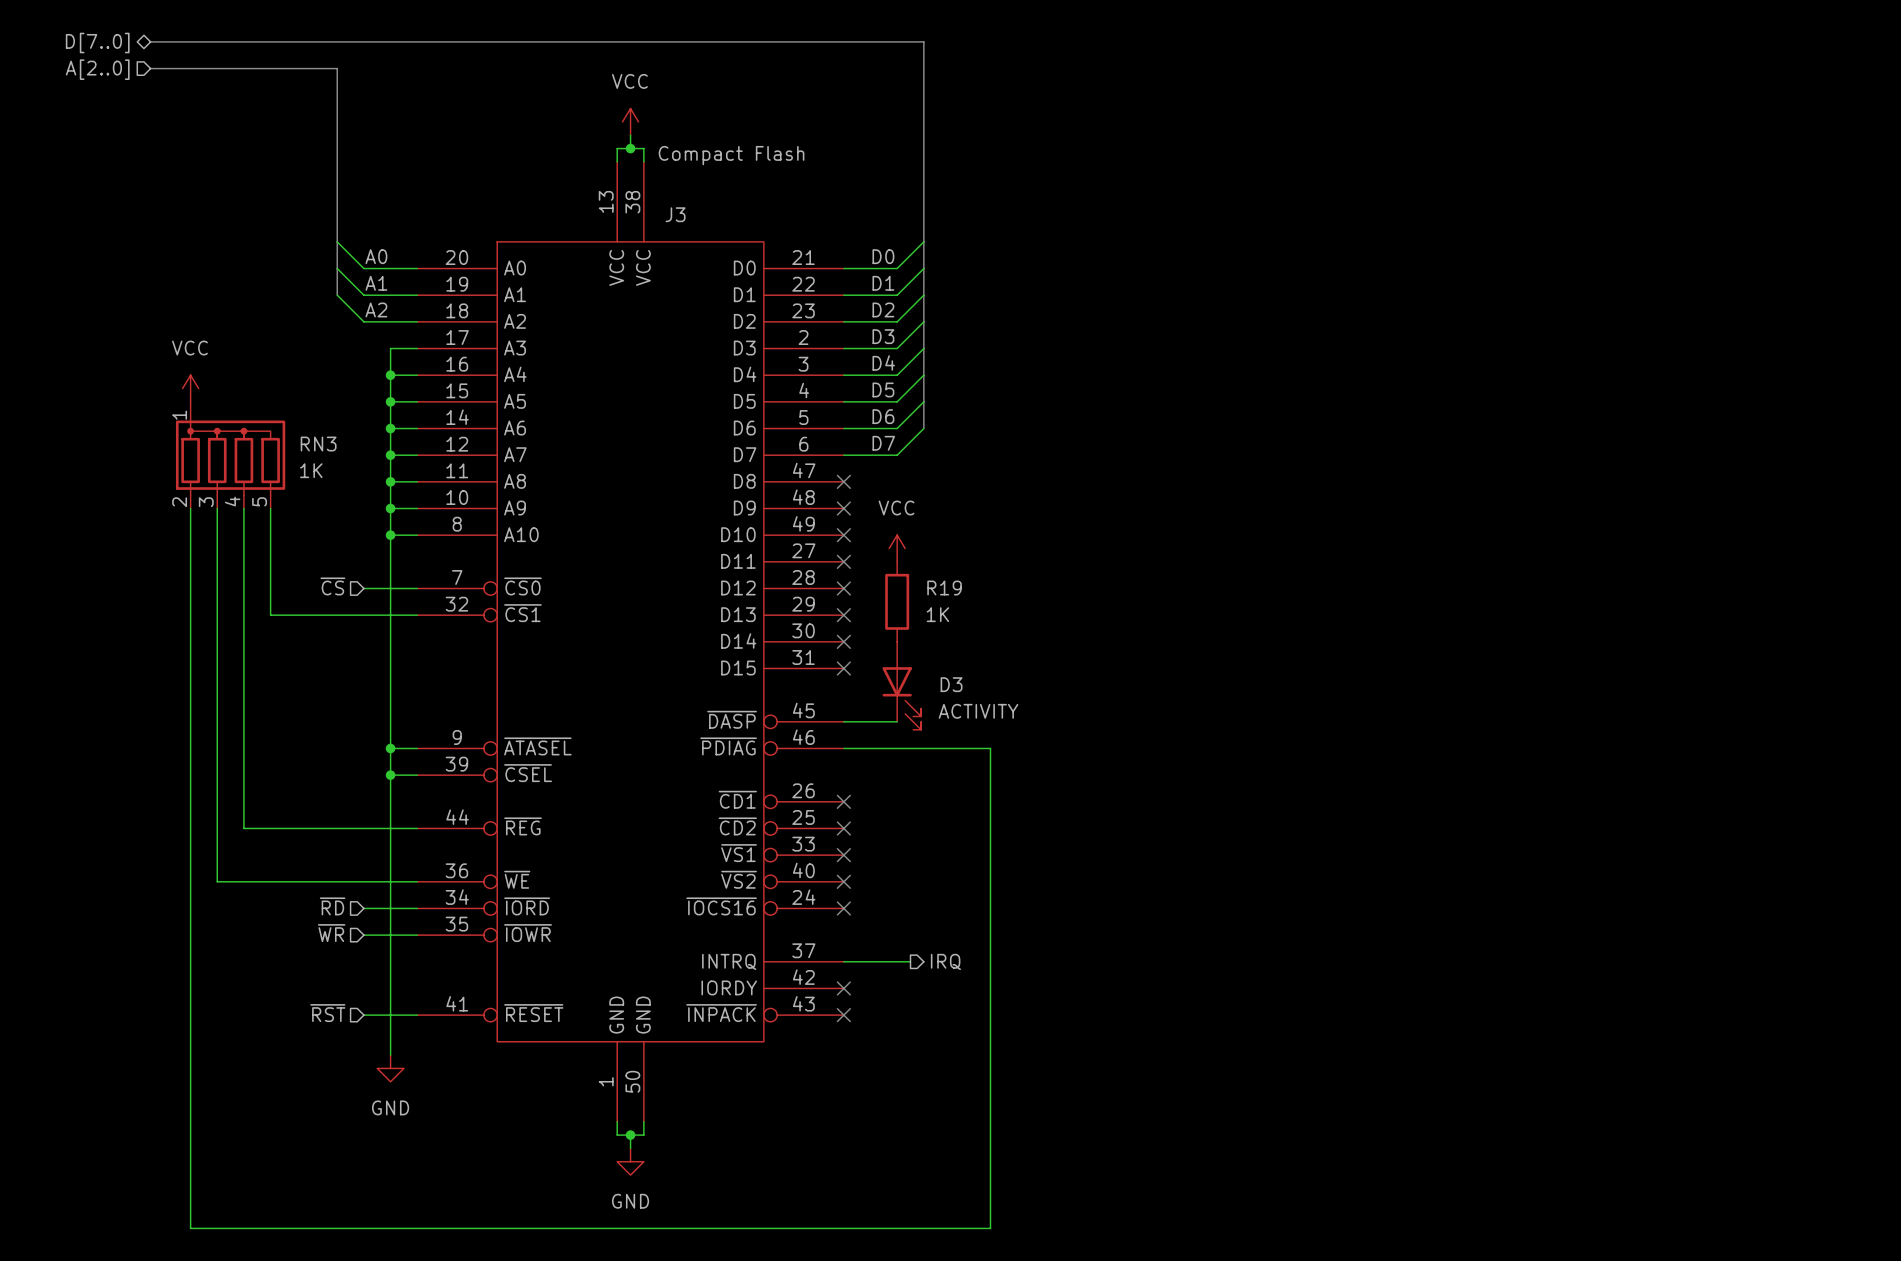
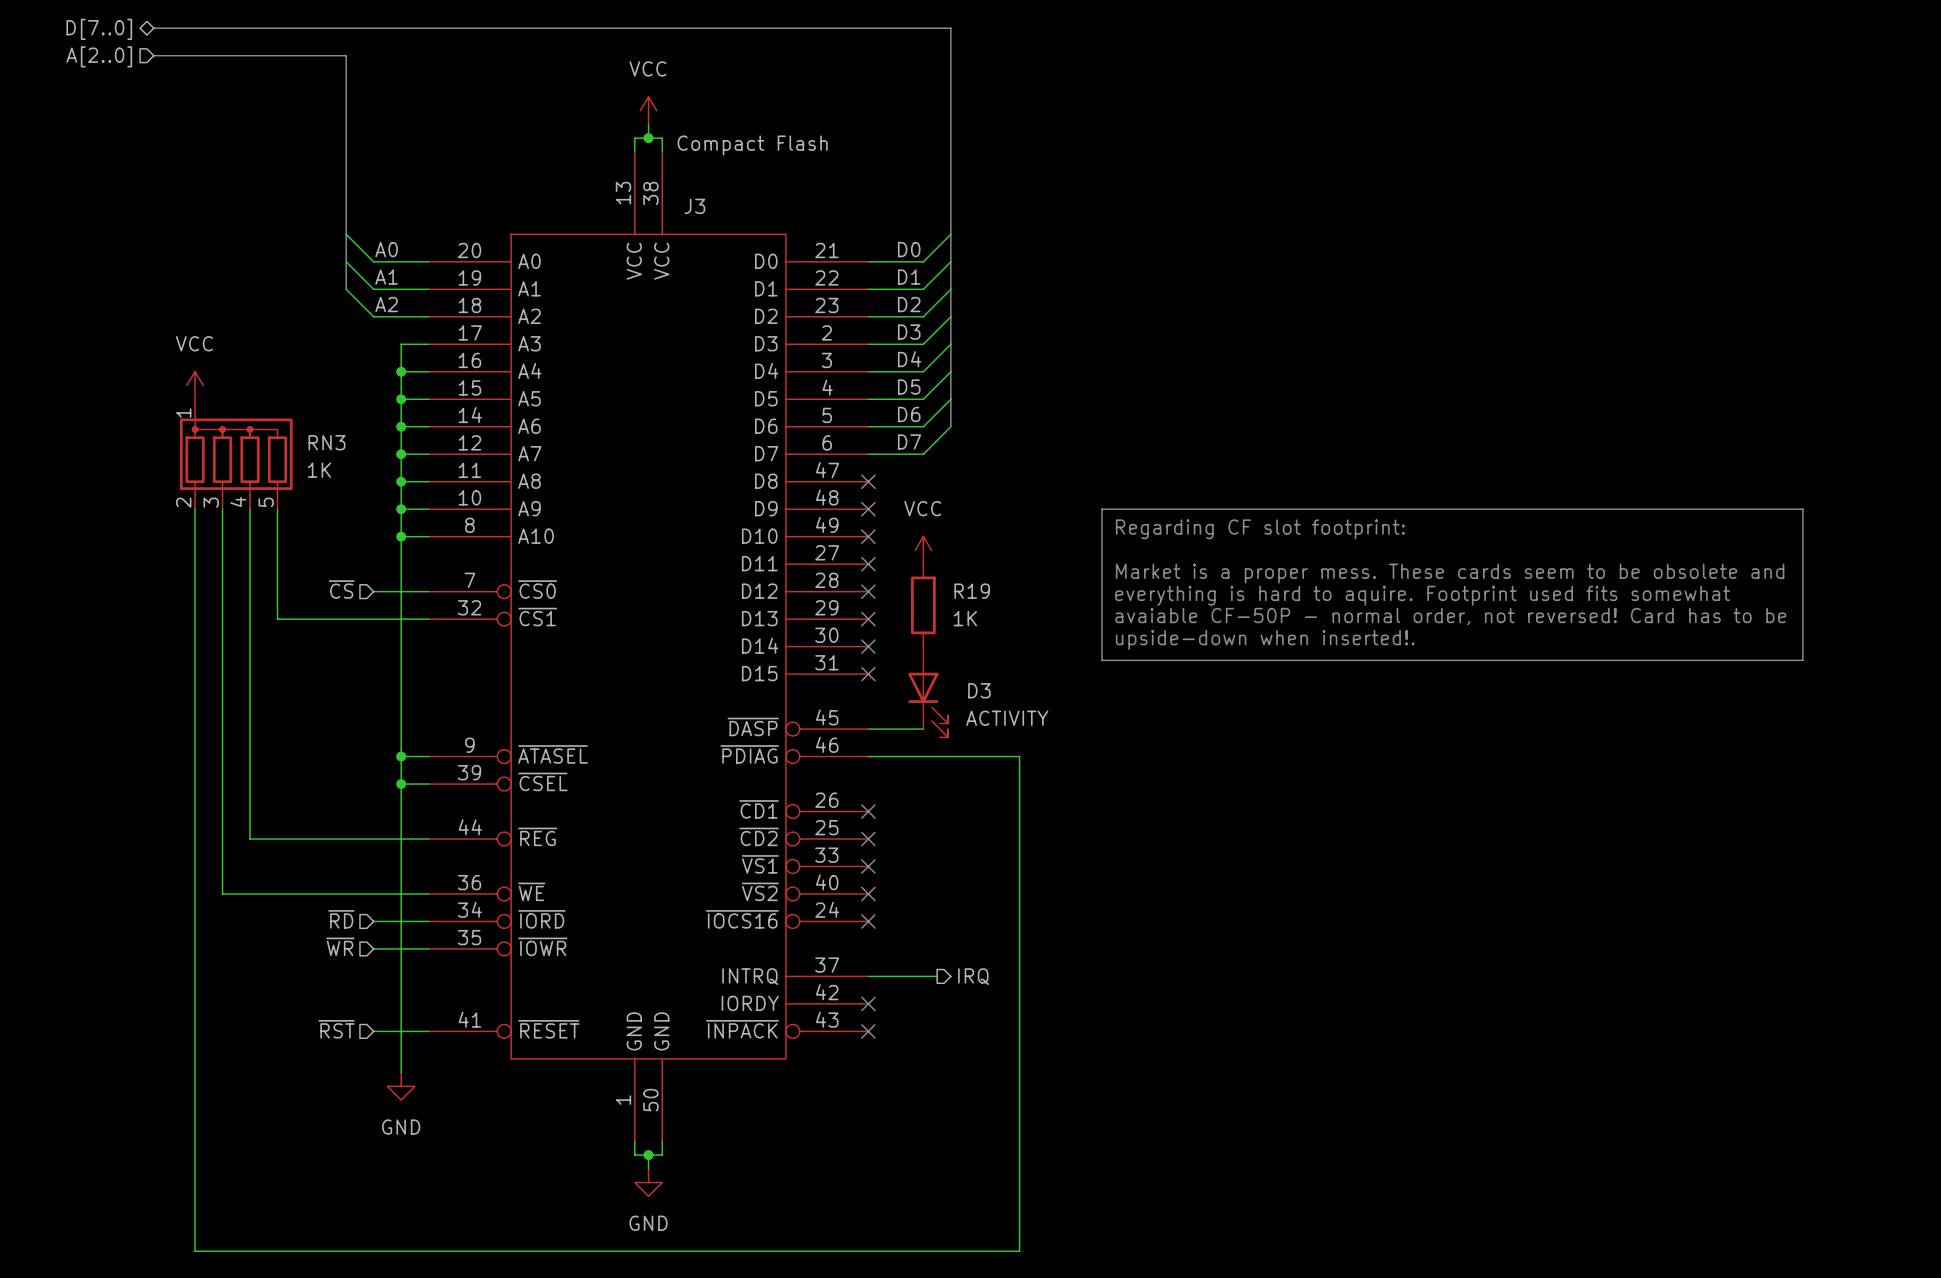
line: none -> (1102, 509) (1802, 509) (1802, 660) (1102, 660) (1102, 509)
text: none -> Regarding CF slot footprint: (1260, 529)
text: none -> Market is a proper mess. These cards seem to be obsolete and (1450, 573)
text: none -> everything is hard to aquire. Footprint used fits somewhat (1422, 595)
text: none -> avaiable CF-50P - normal order, not reversed! Card has to be (1450, 616)
text: none -> upside-down when inserted!. (1265, 639)

